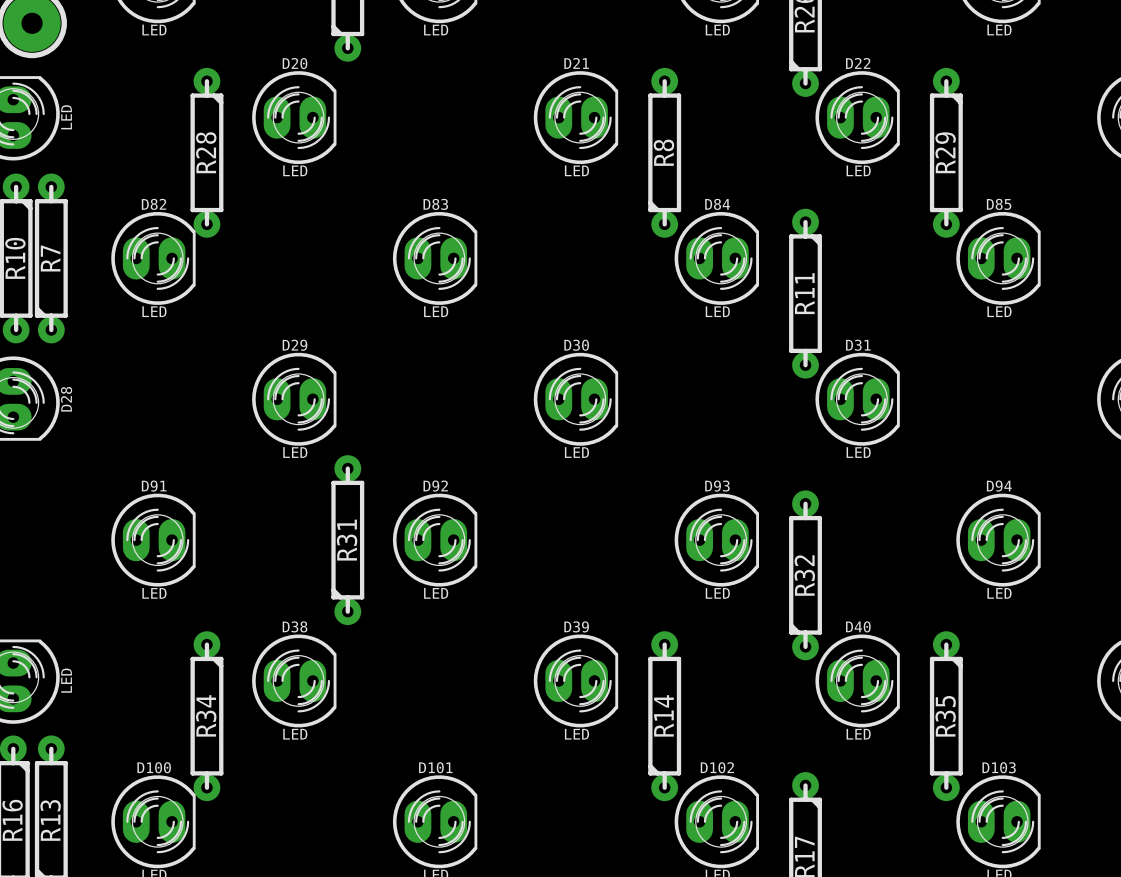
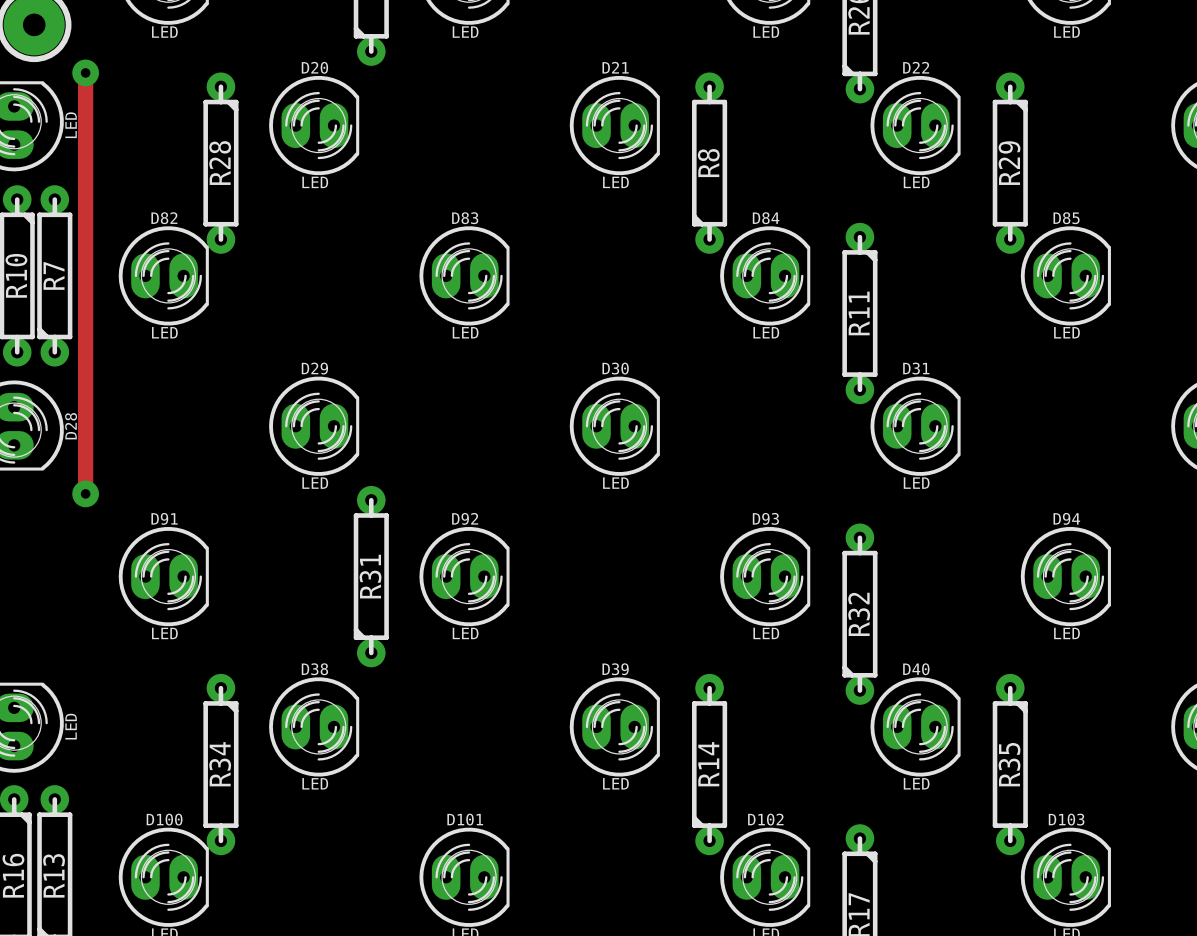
track: none -> (85, 72) (85, 493)
via: none -> (85, 72)
via: none -> (85, 493)

